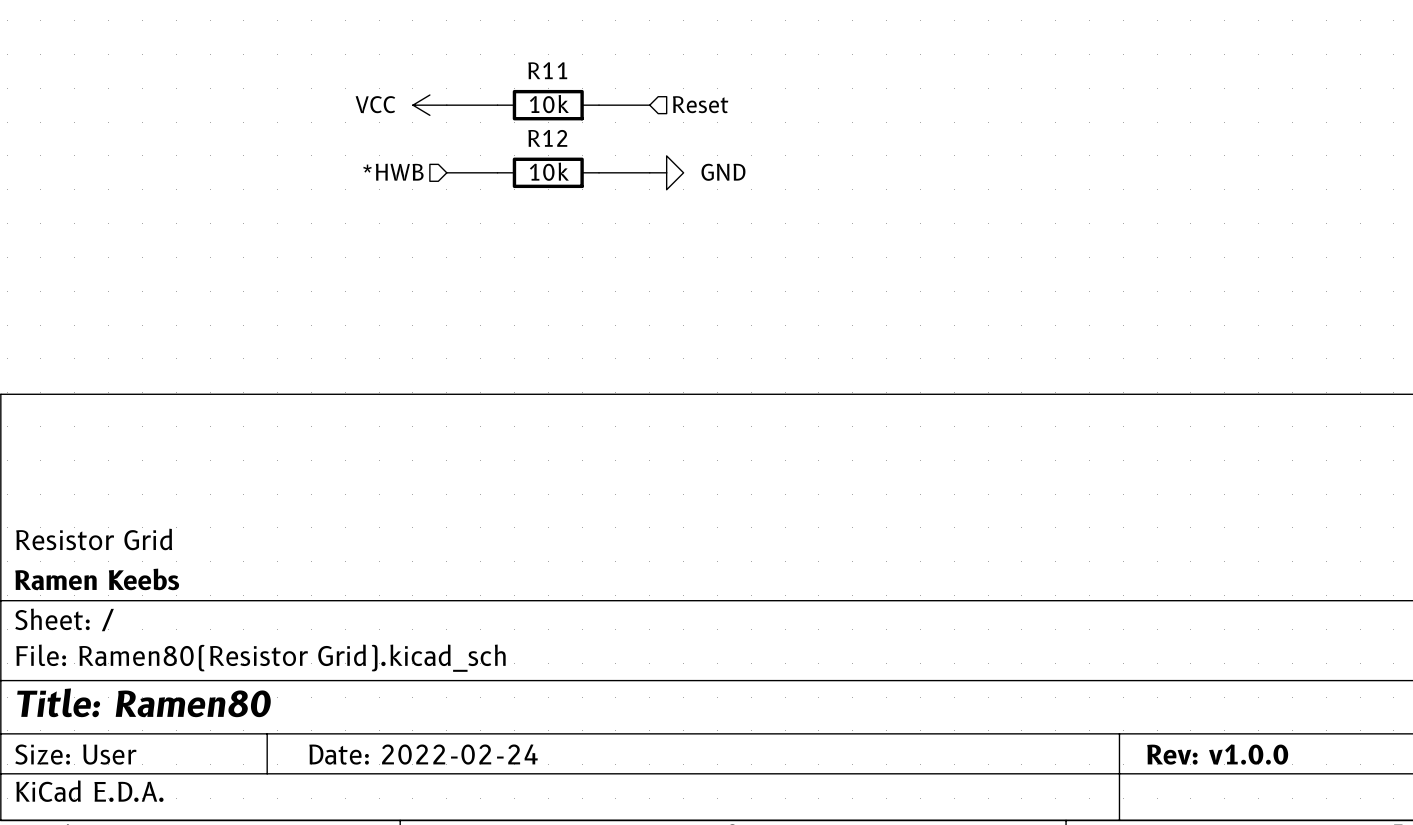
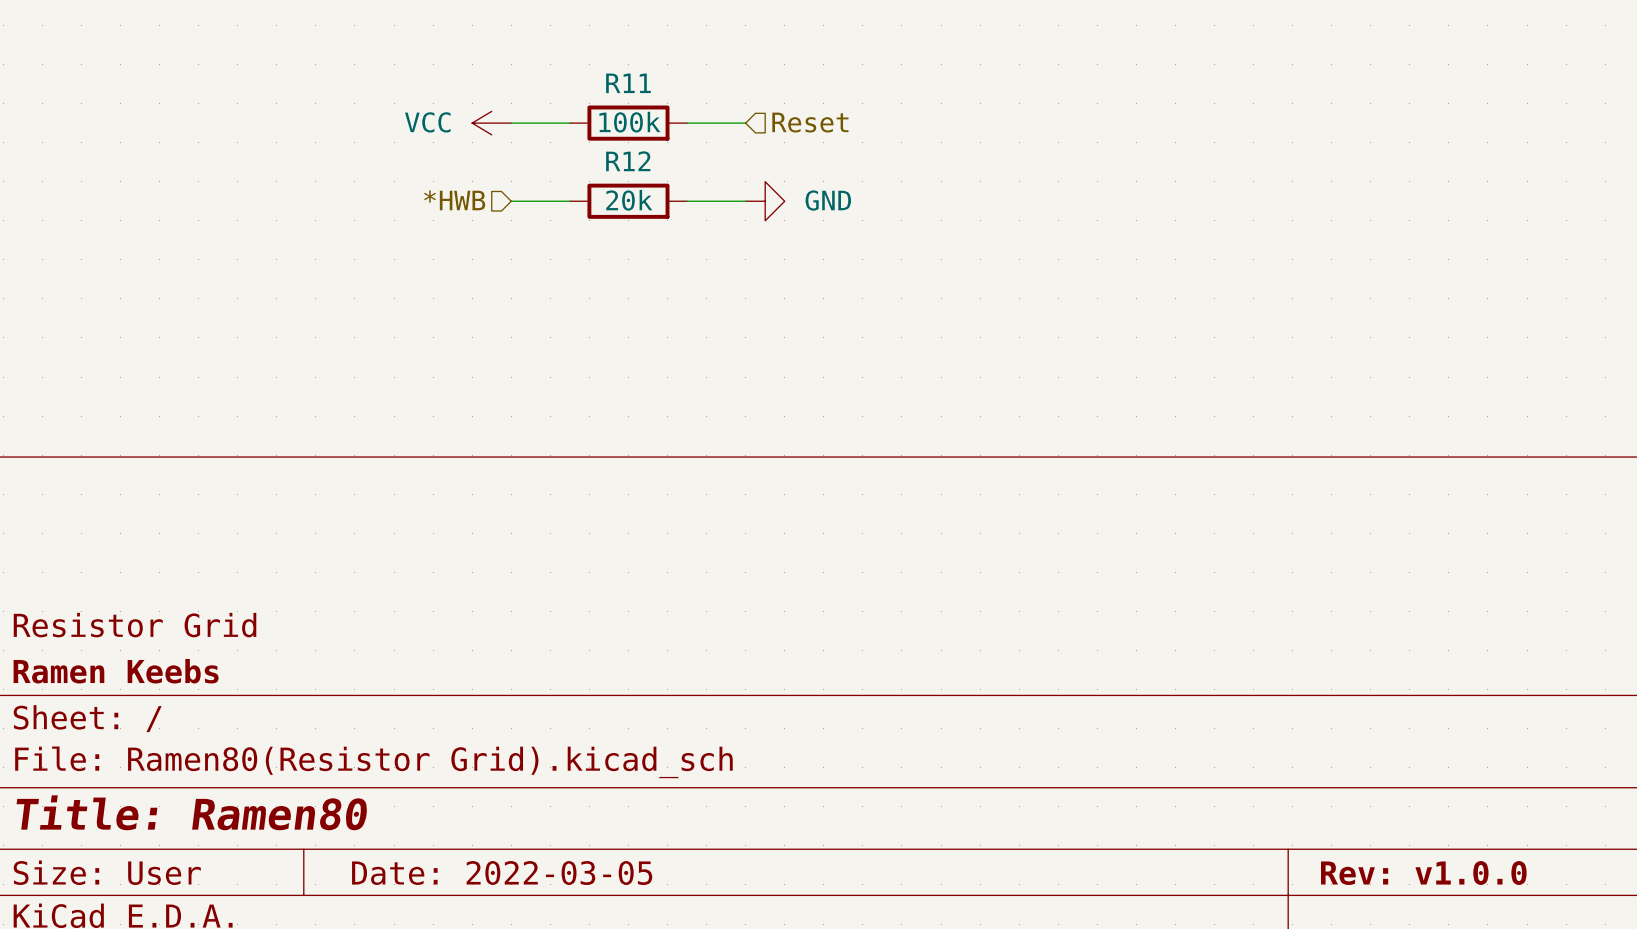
R11 value: 10k (549, 104) -> 100k (629, 122)
R12 value: 10k (549, 171) -> 20k (629, 200)
title block: Date: 2022-02-24 (423, 754) -> Date: 2022-03-05 (502, 873)

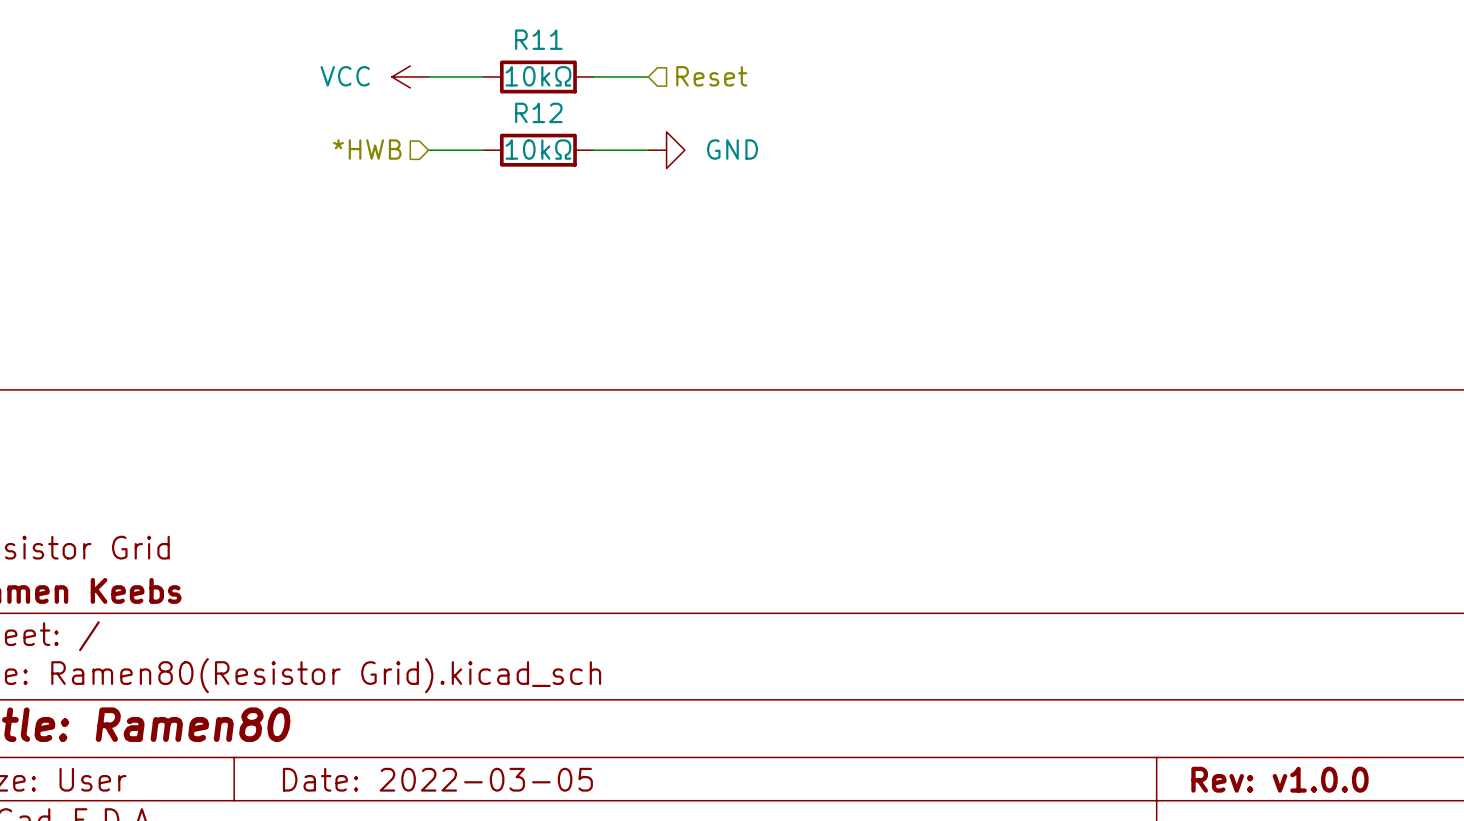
R11 value: 100k (629, 122) -> 10kΩ (538, 76)
R12 value: 20k (629, 200) -> 10kΩ (538, 149)

